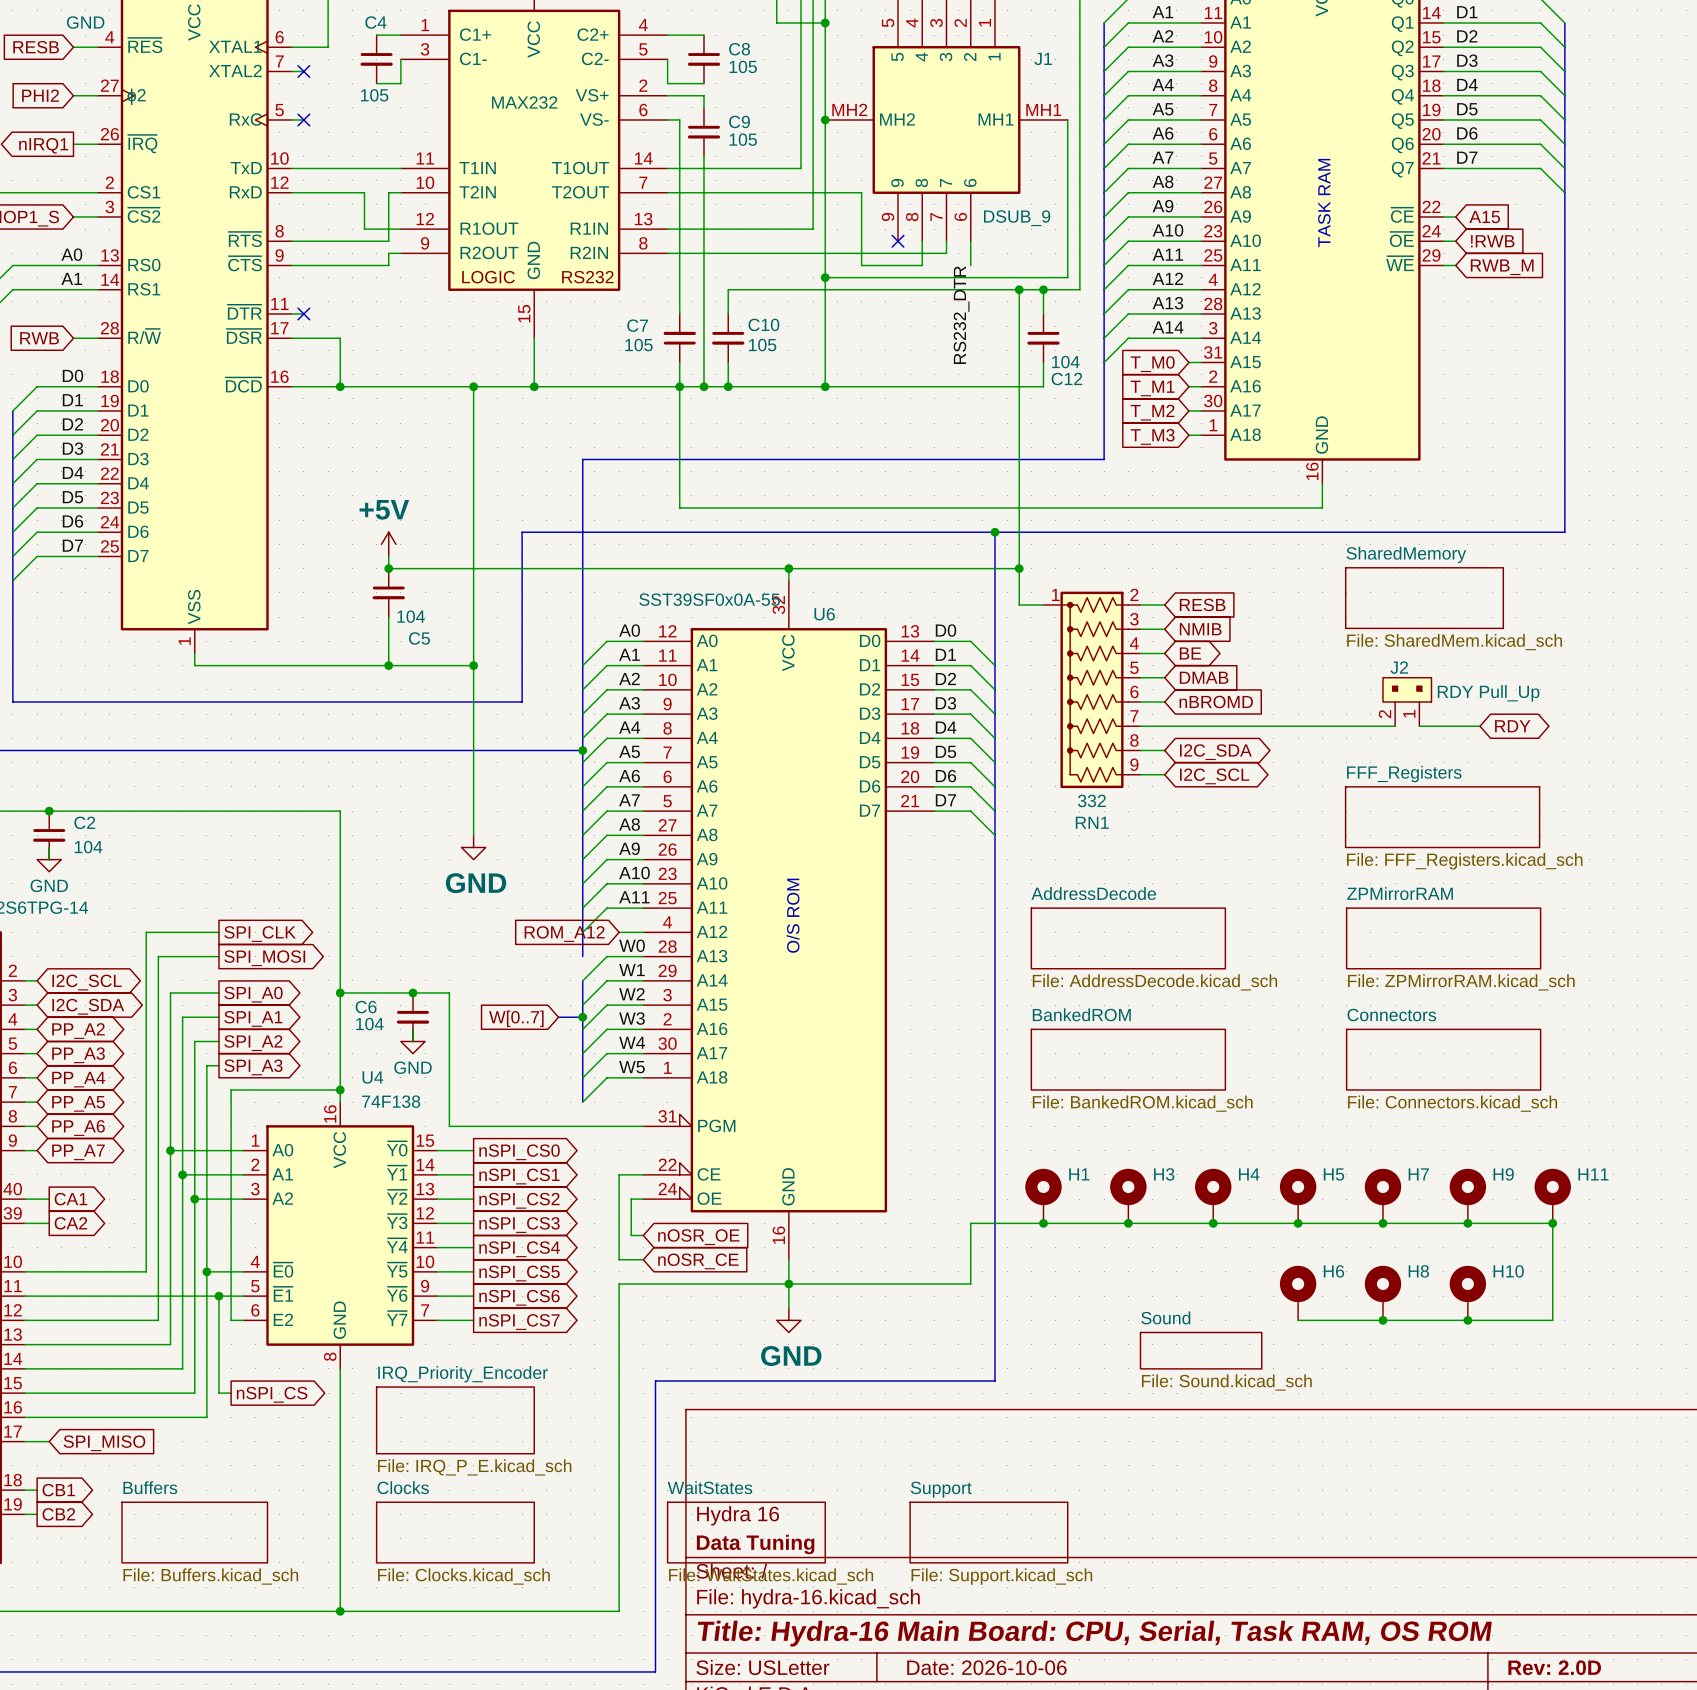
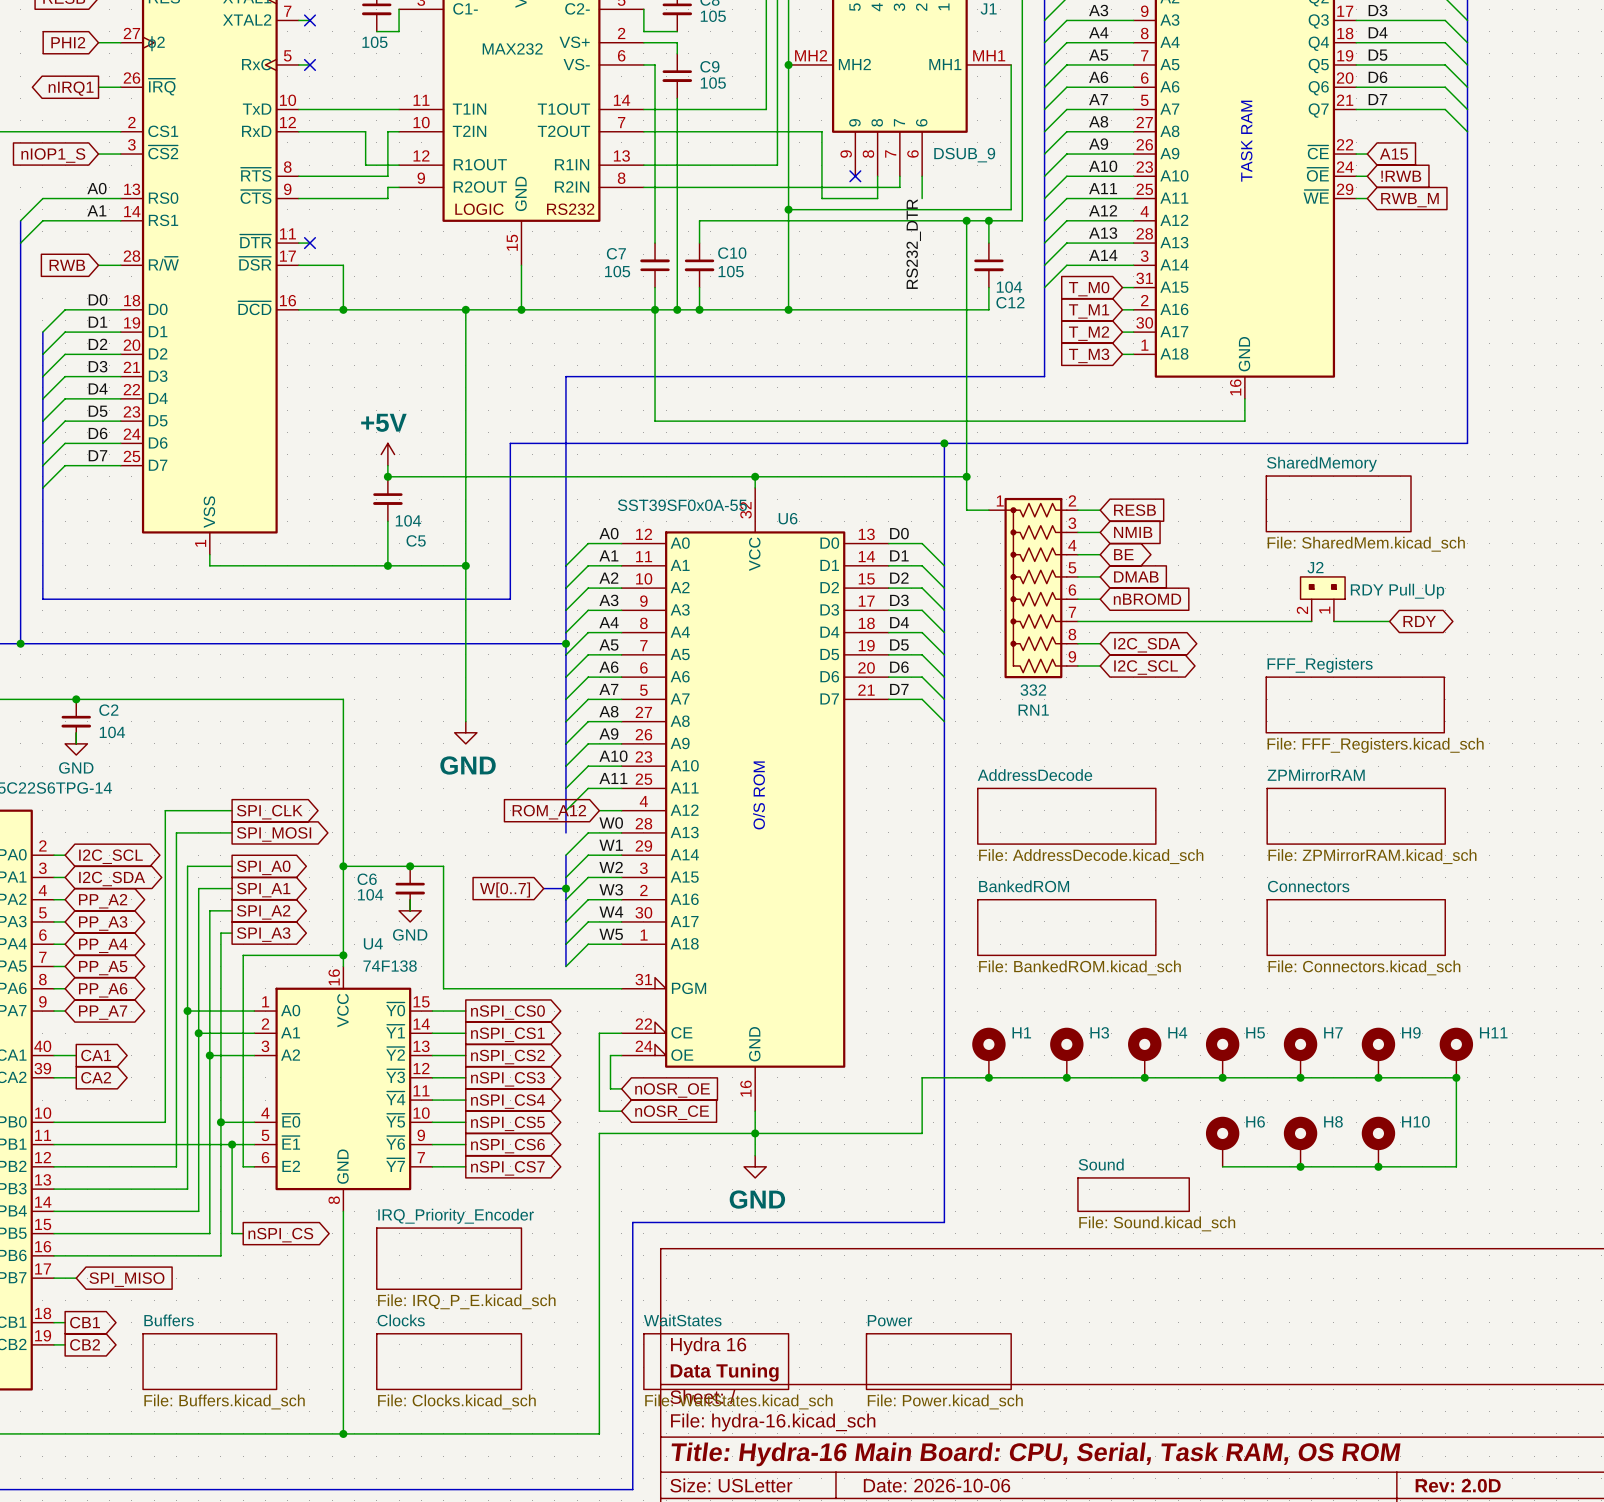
sheet Support name: Support (941, 1489) -> Power (889, 1320)
sheet Support value: File: Support.kicad_sch (1001, 1576) -> File: Power.kicad_sch (945, 1401)

